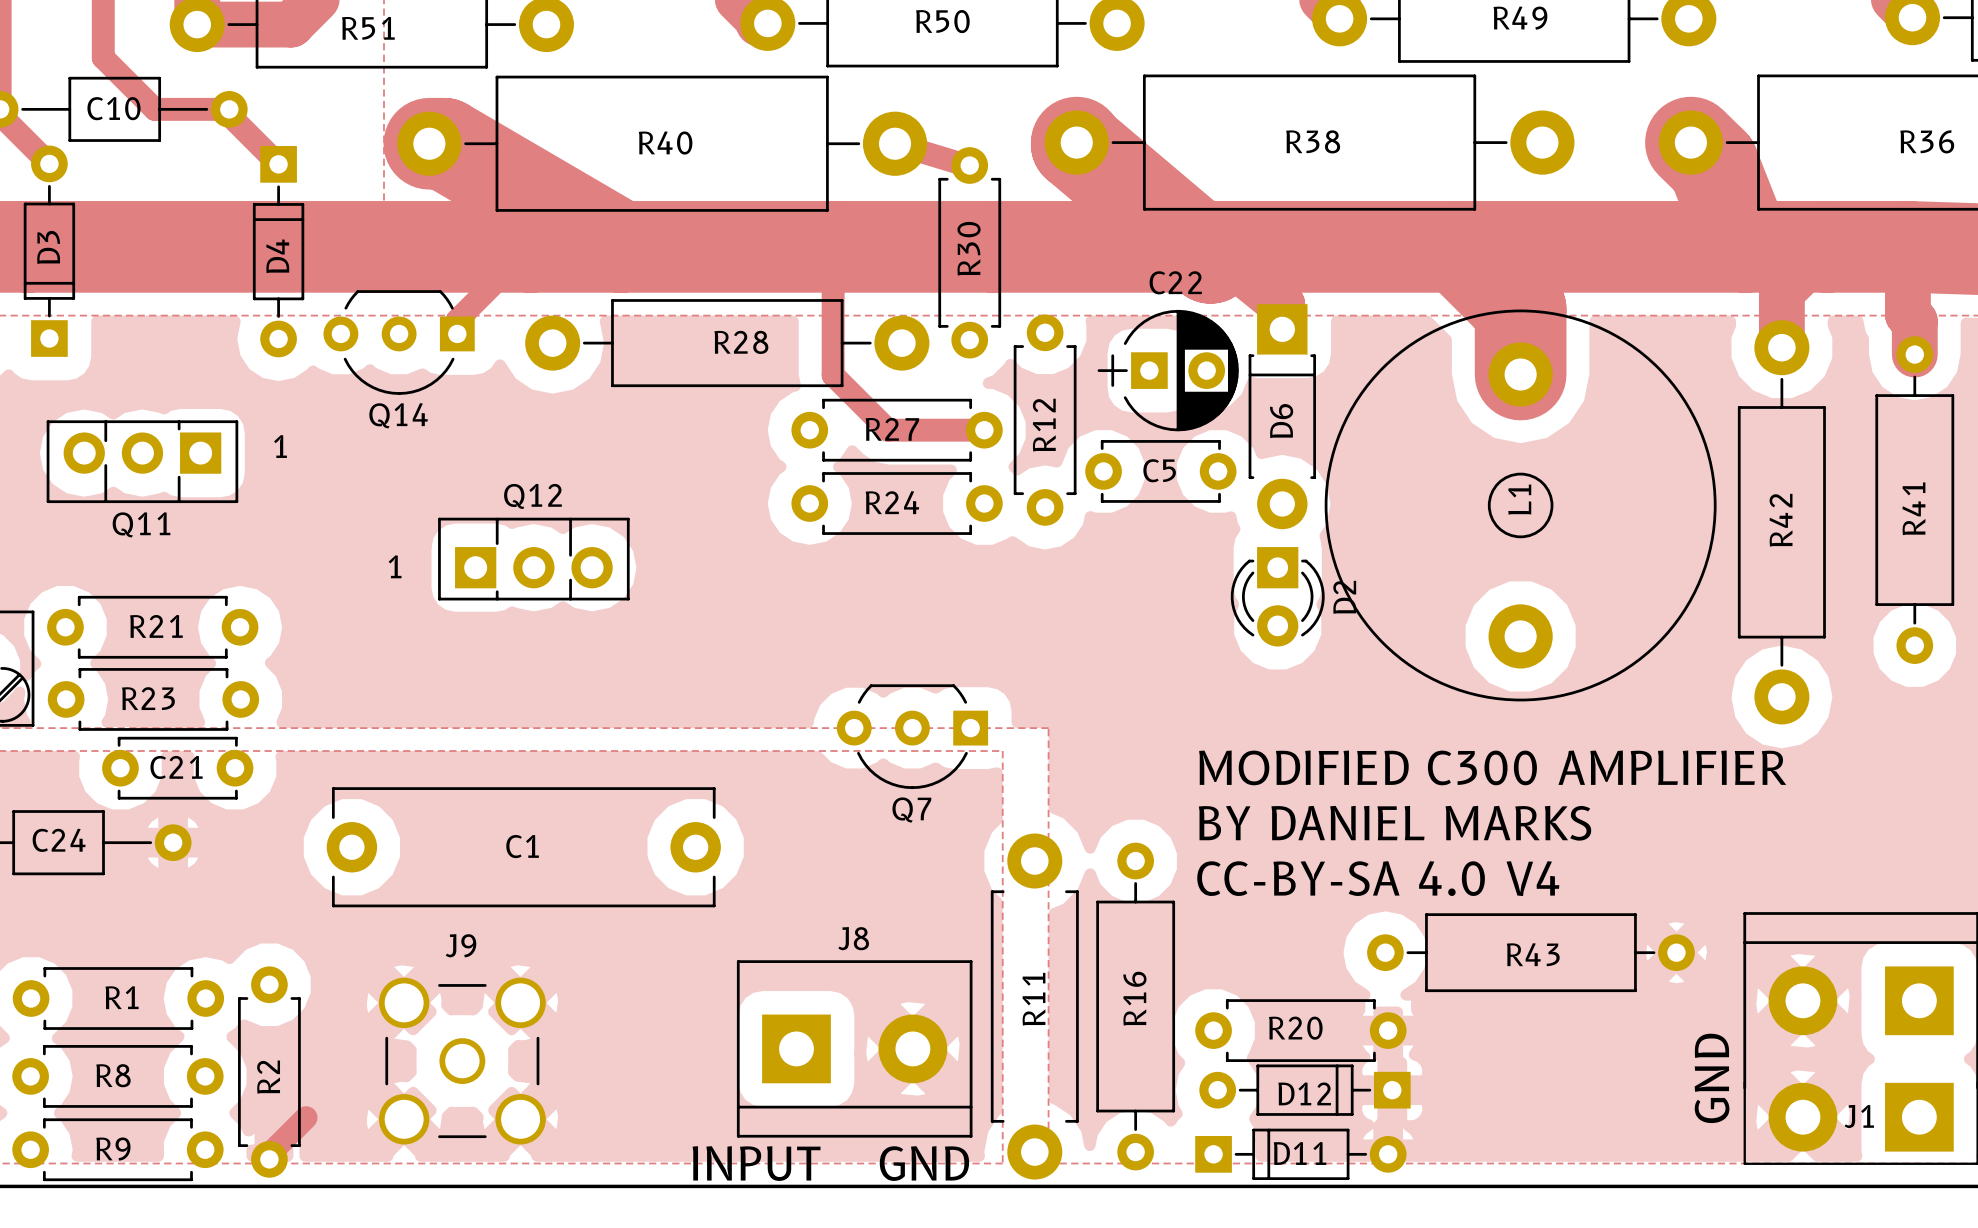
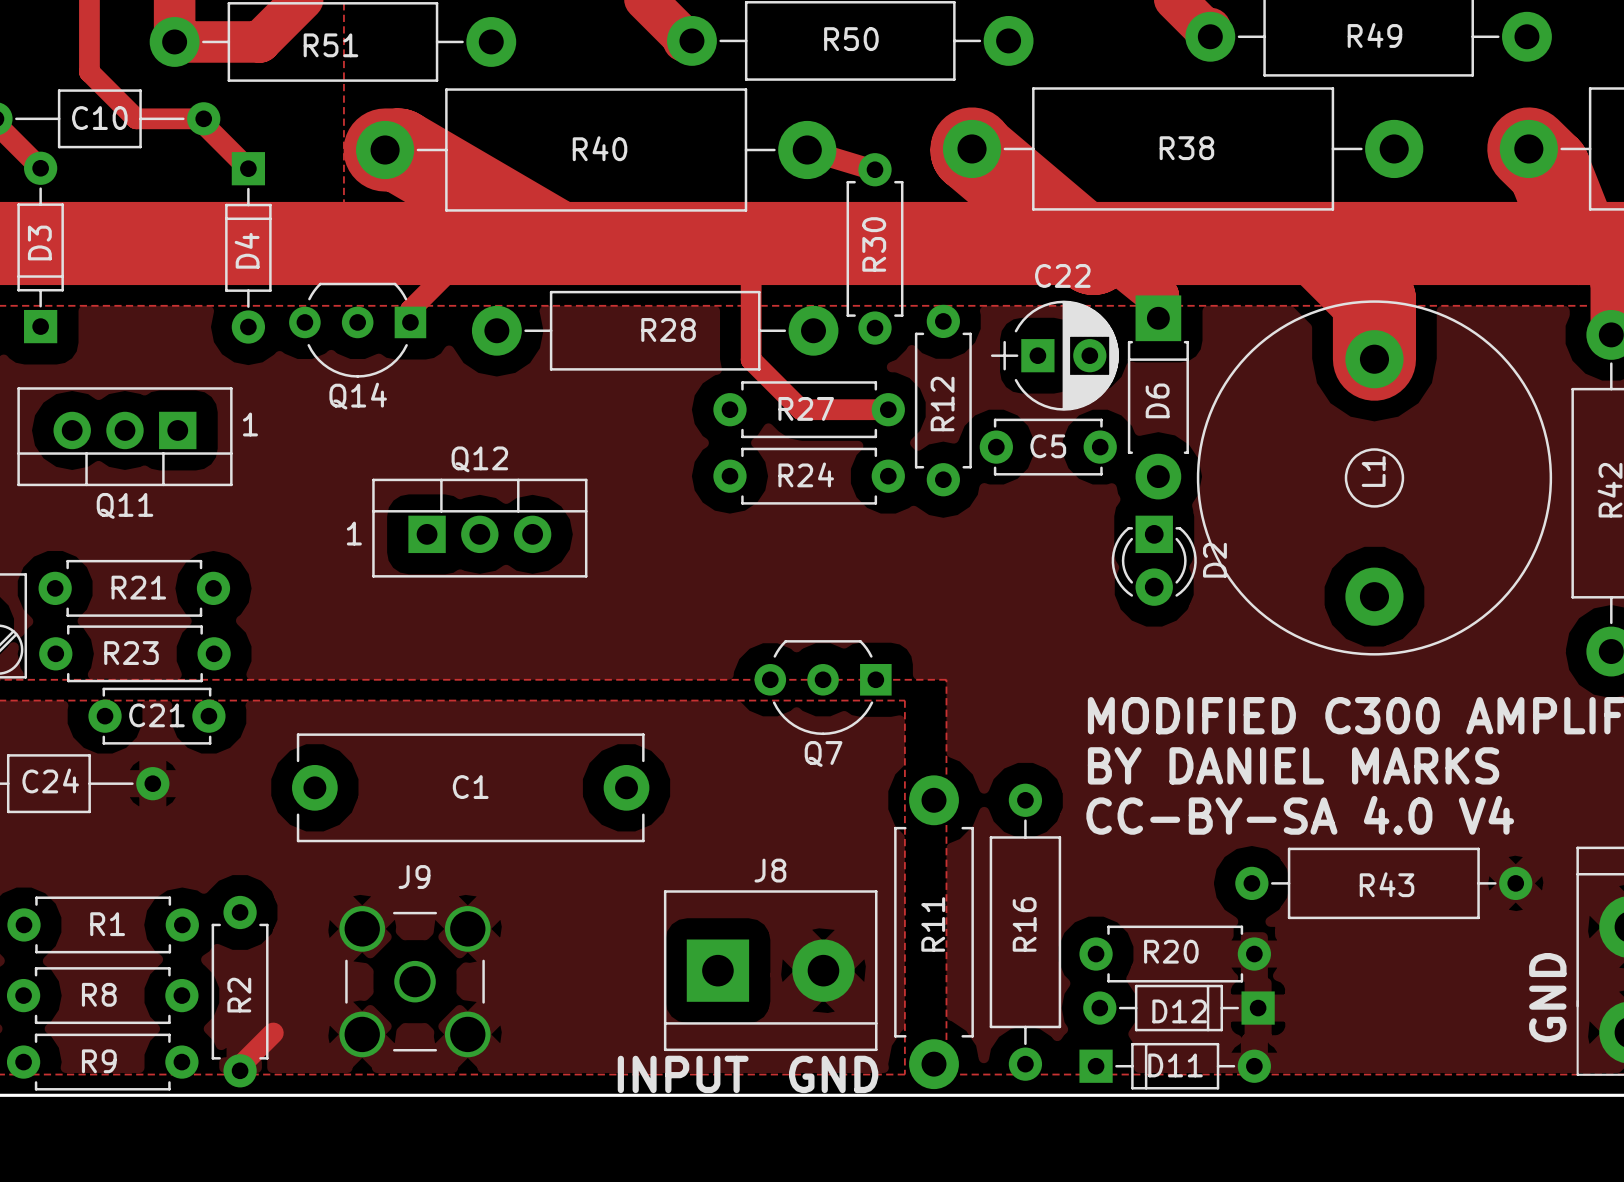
Q11 footprint: [46, 420, 239, 504] -> [17, 387, 233, 487]
Q12 footprint: [438, 517, 630, 601] -> [372, 478, 588, 578]

